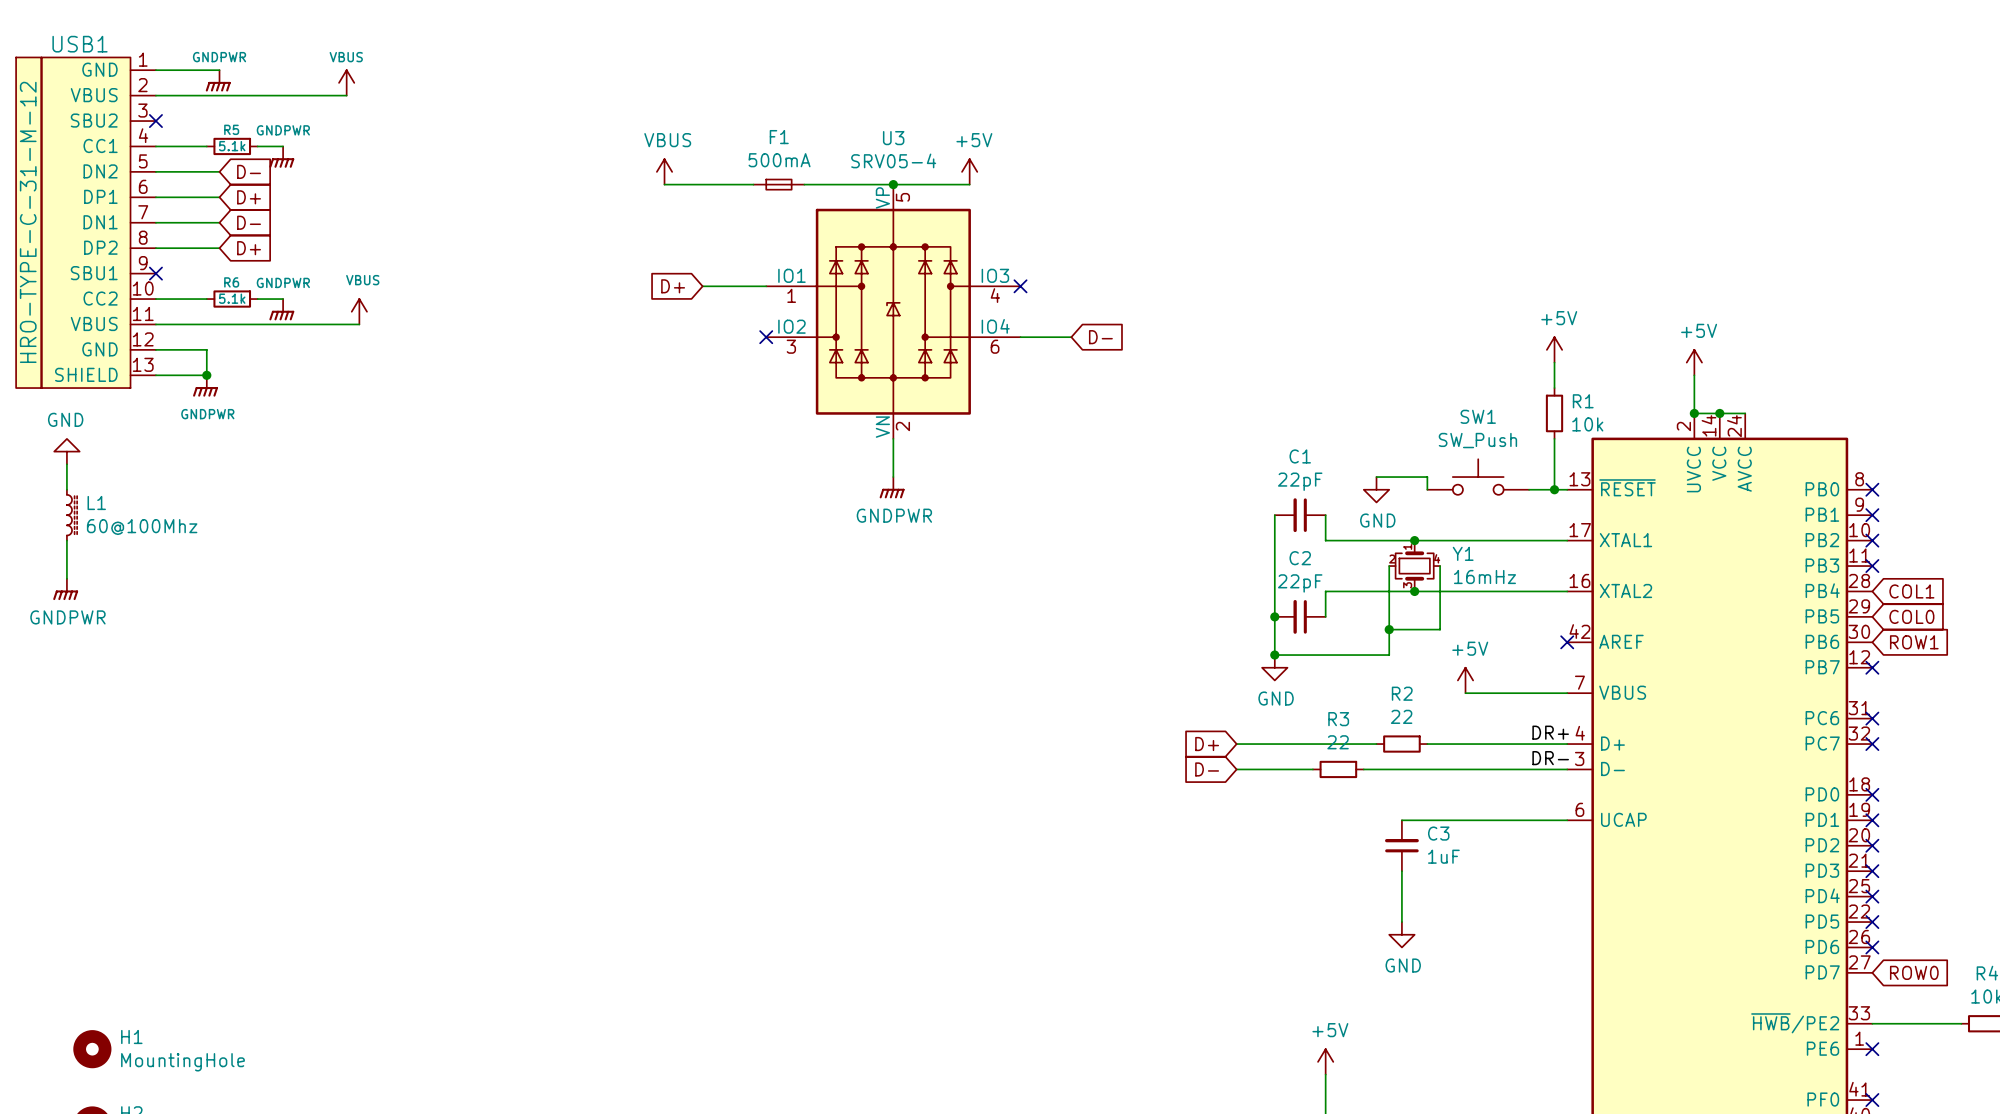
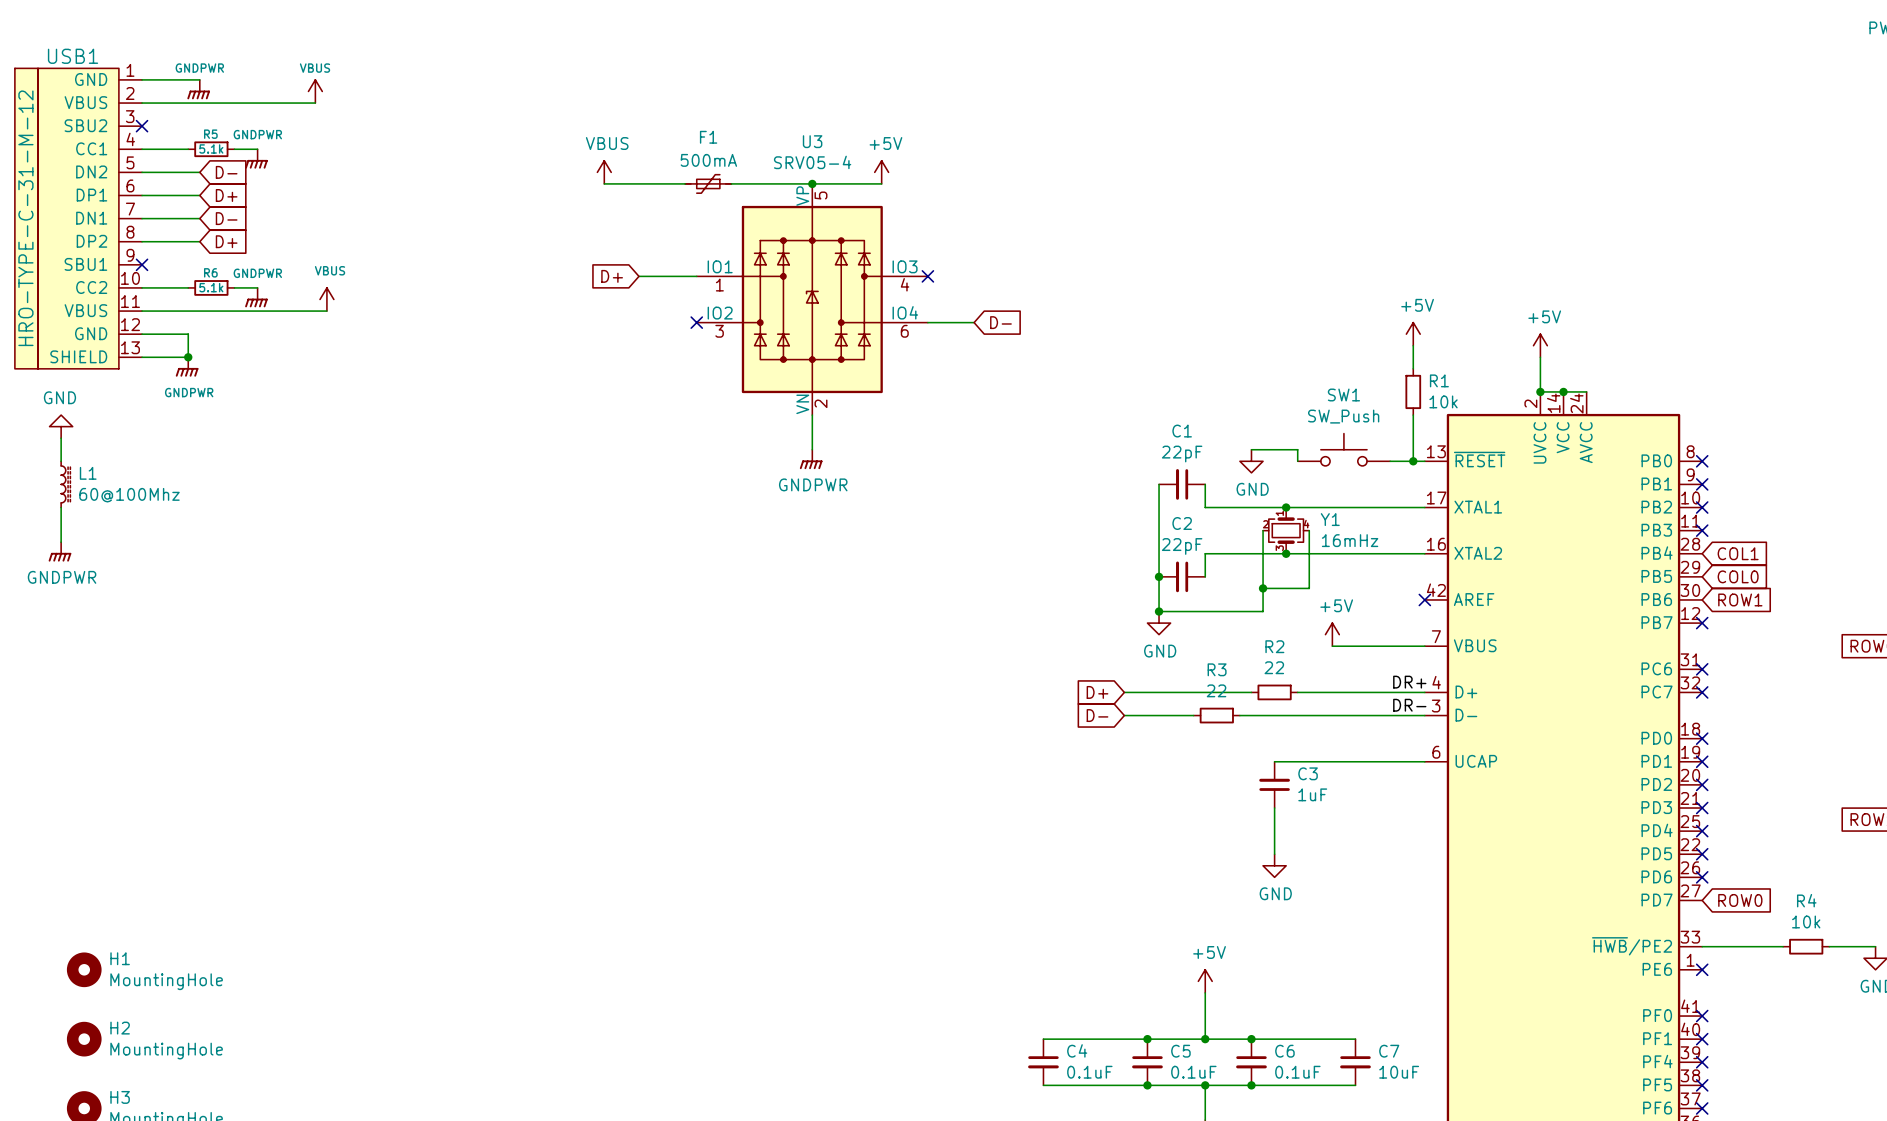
F1 symbol: [753, 179, 805, 190] -> [685, 174, 732, 194]

